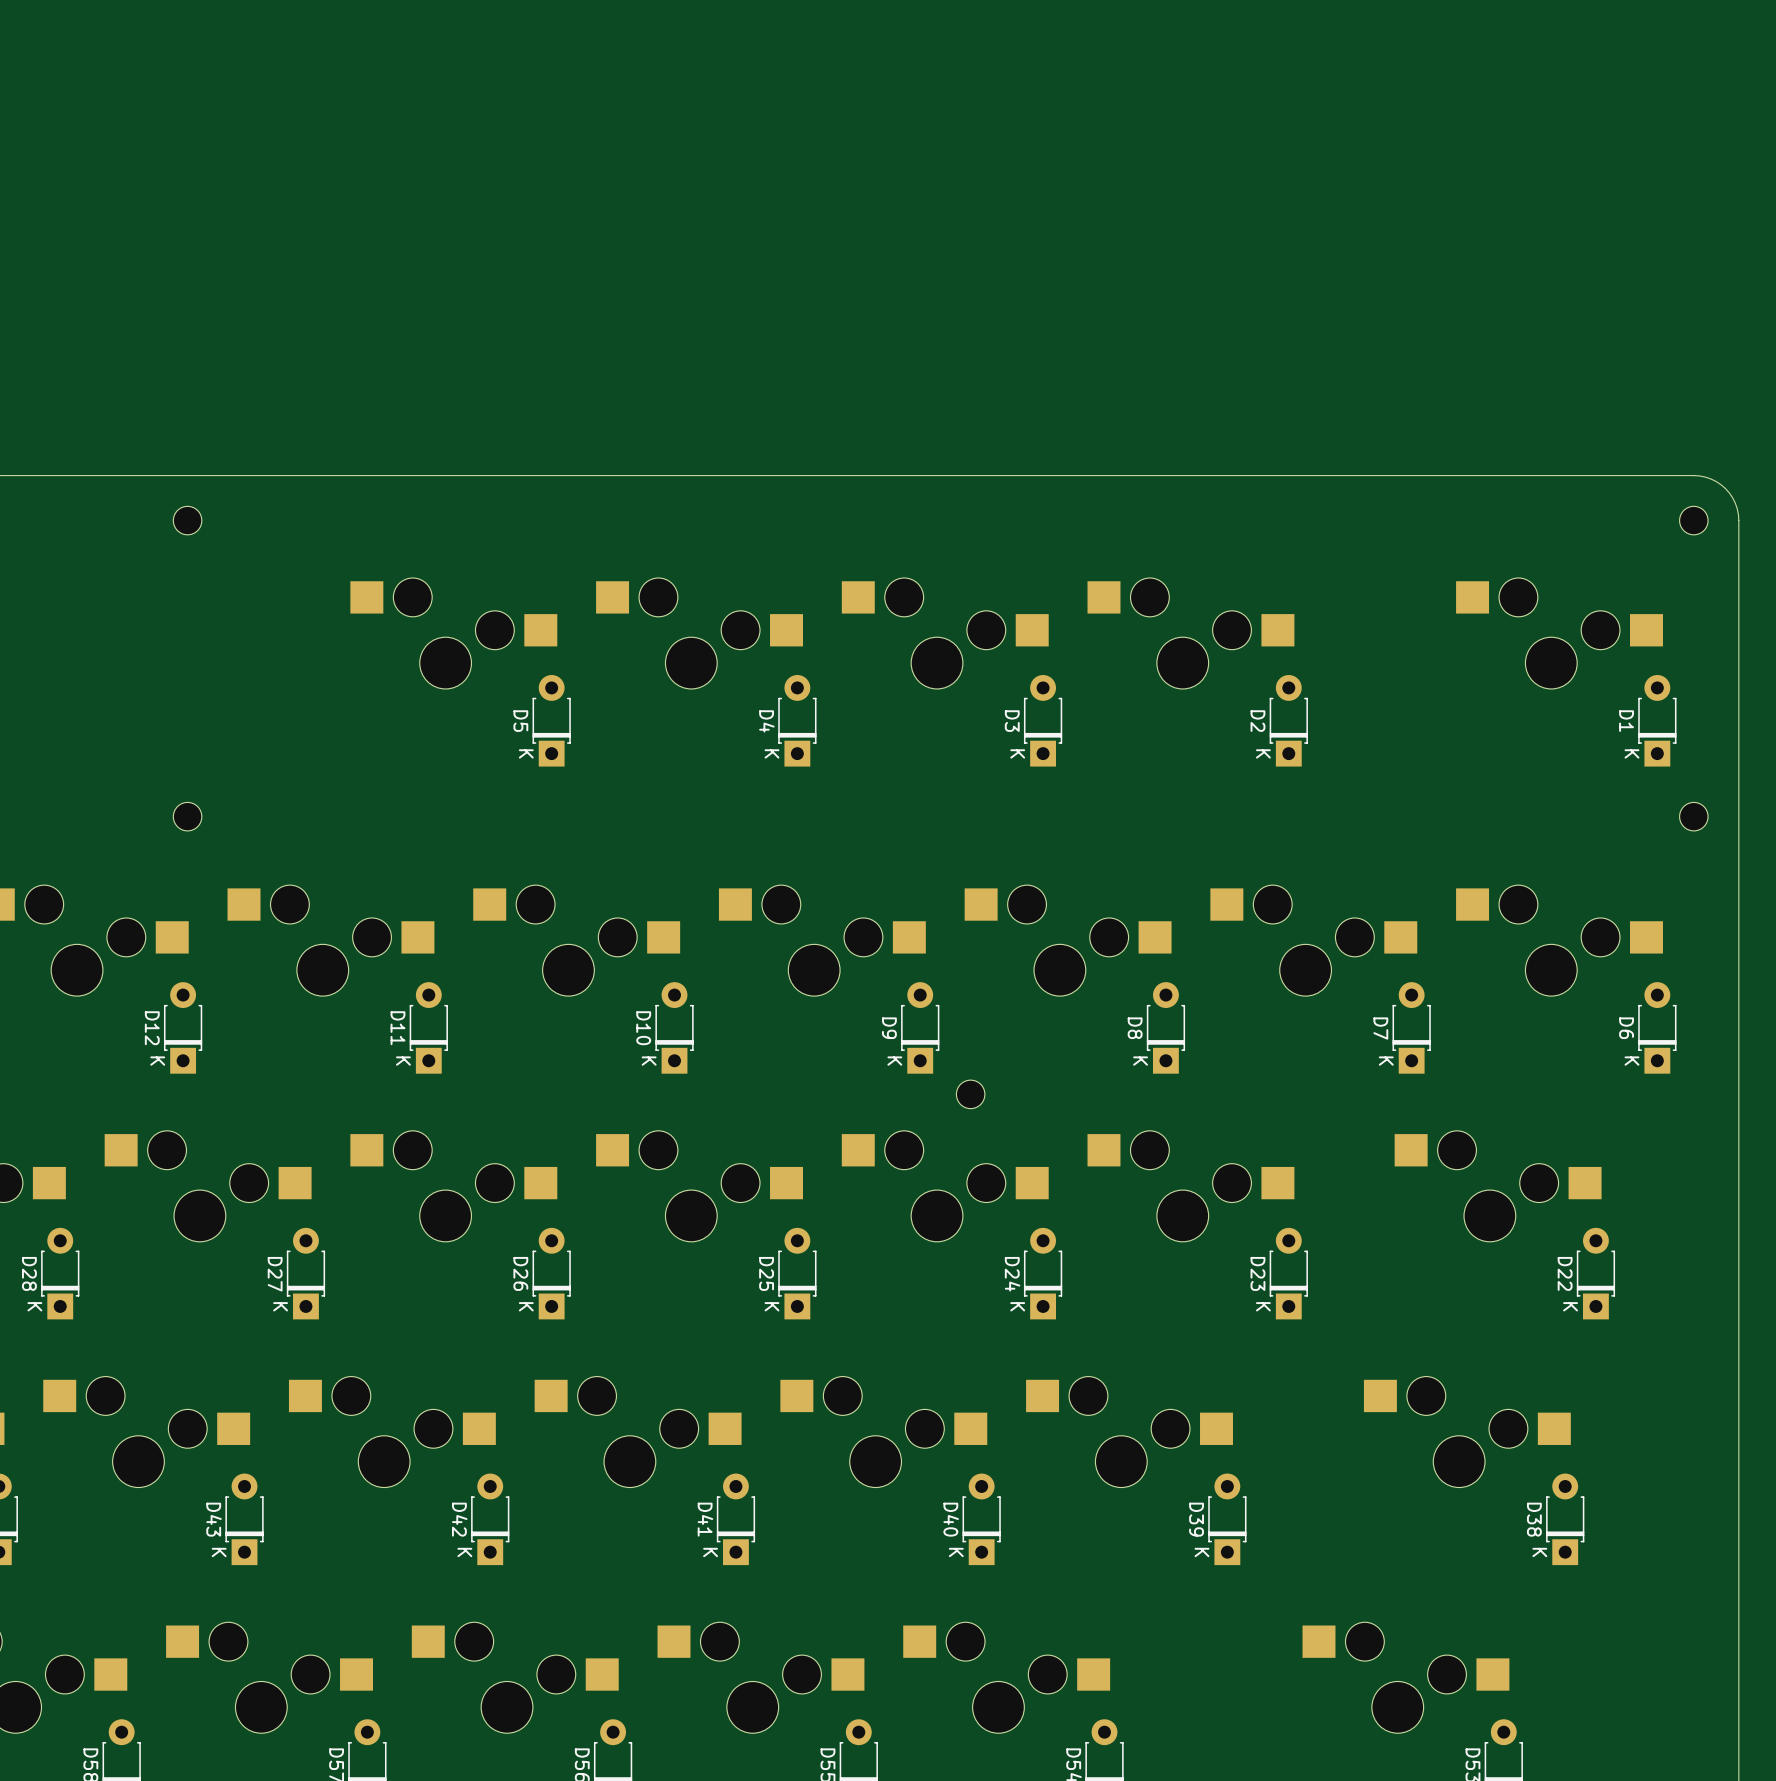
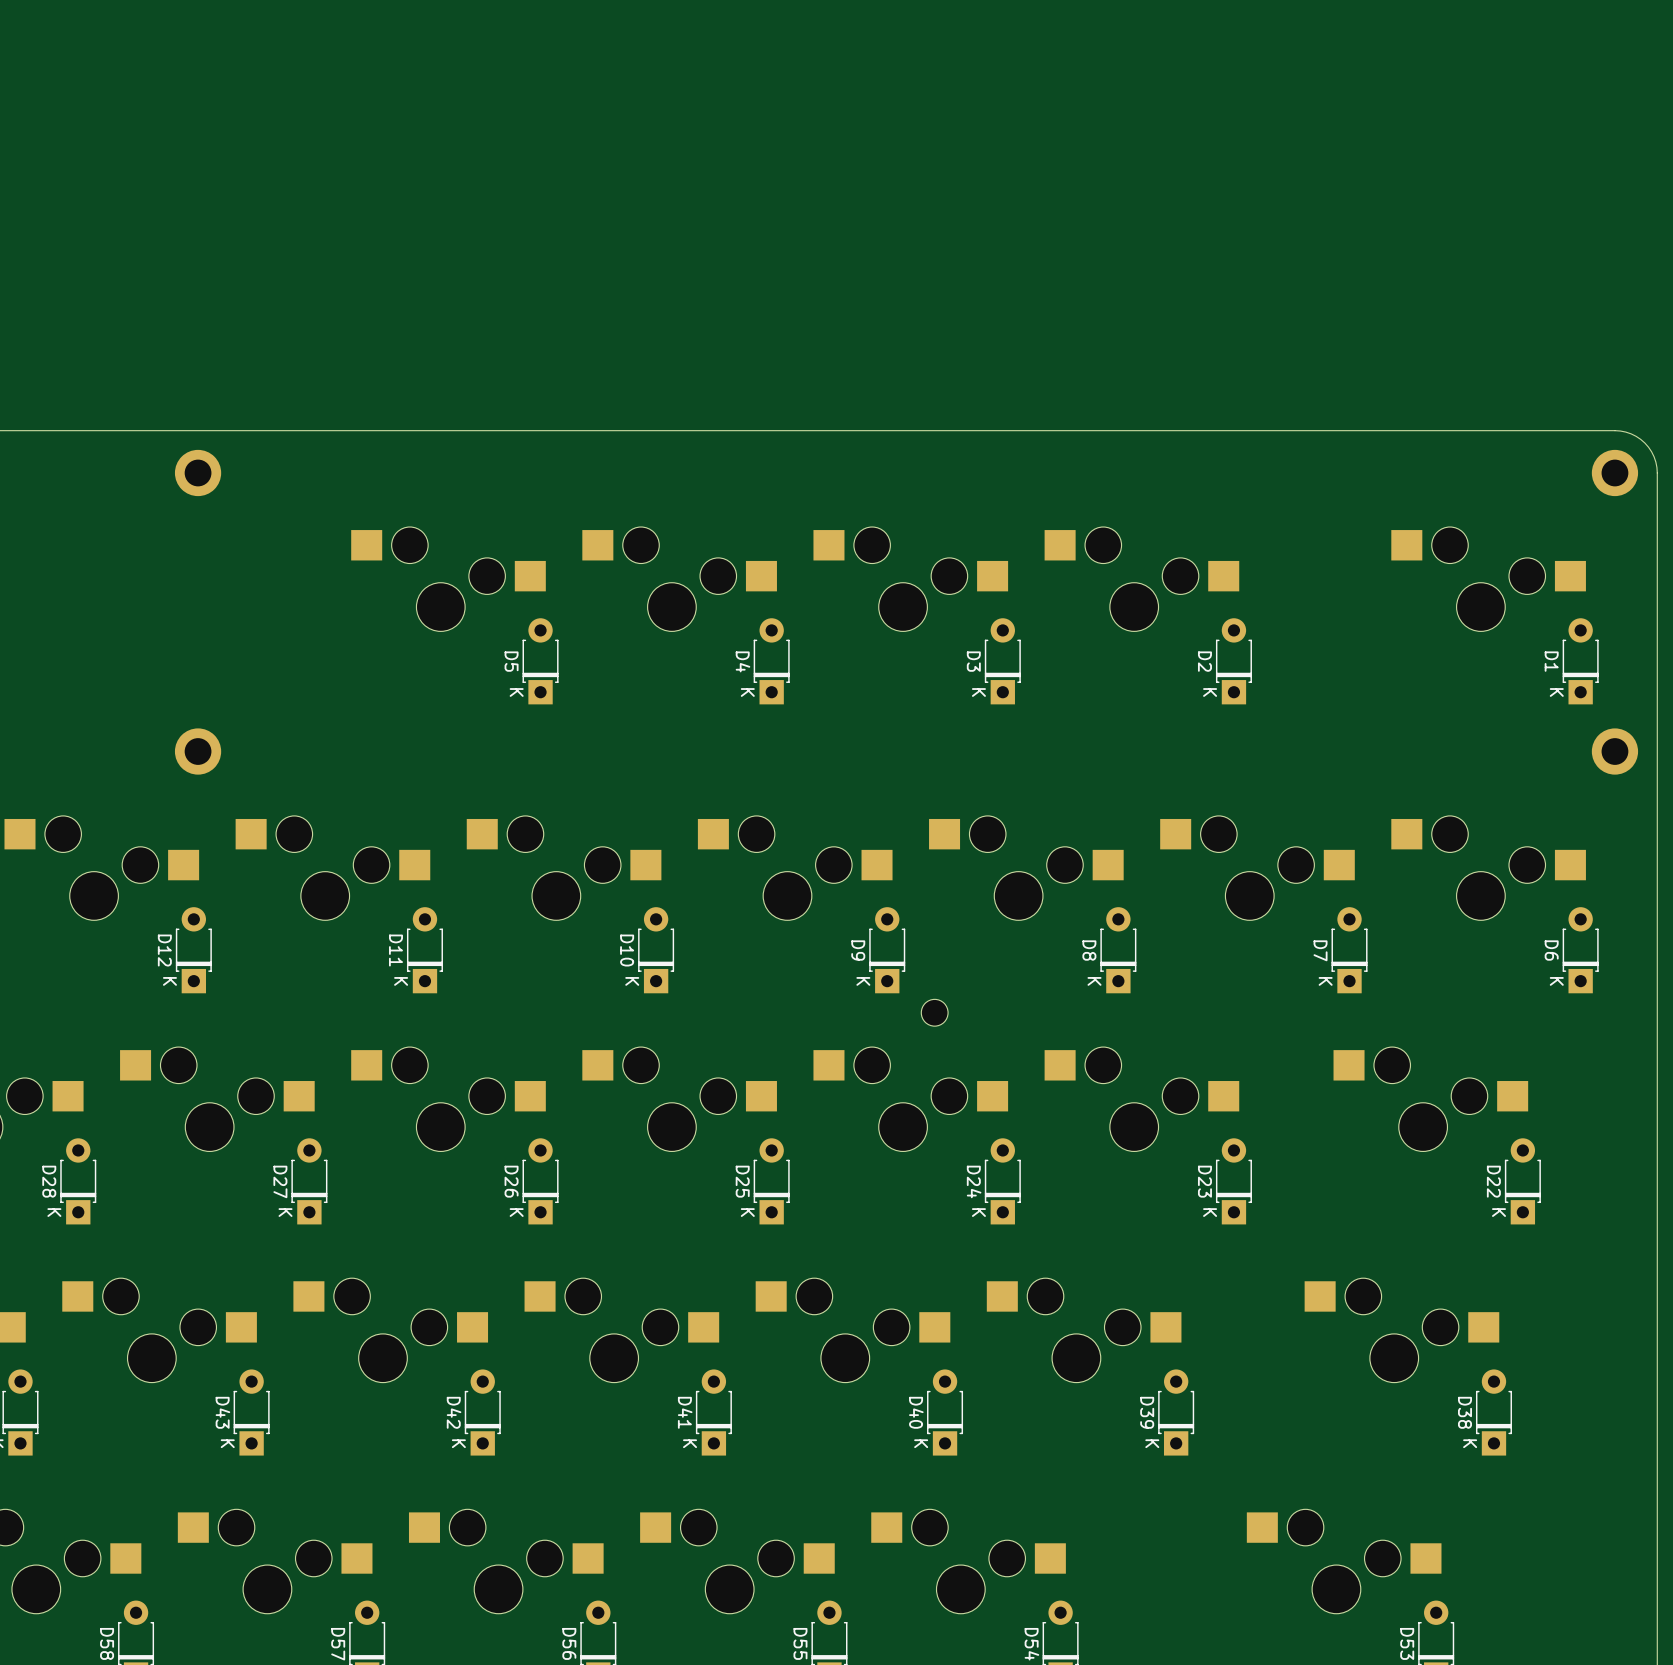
part footprint: [173, 506, 202, 535] -> [174, 449, 222, 497]
part footprint: [1679, 506, 1709, 535] -> [1591, 449, 1639, 497]
part footprint: [173, 802, 202, 831] -> [174, 728, 222, 775]
part footprint: [1679, 802, 1709, 831] -> [1591, 728, 1639, 775]

